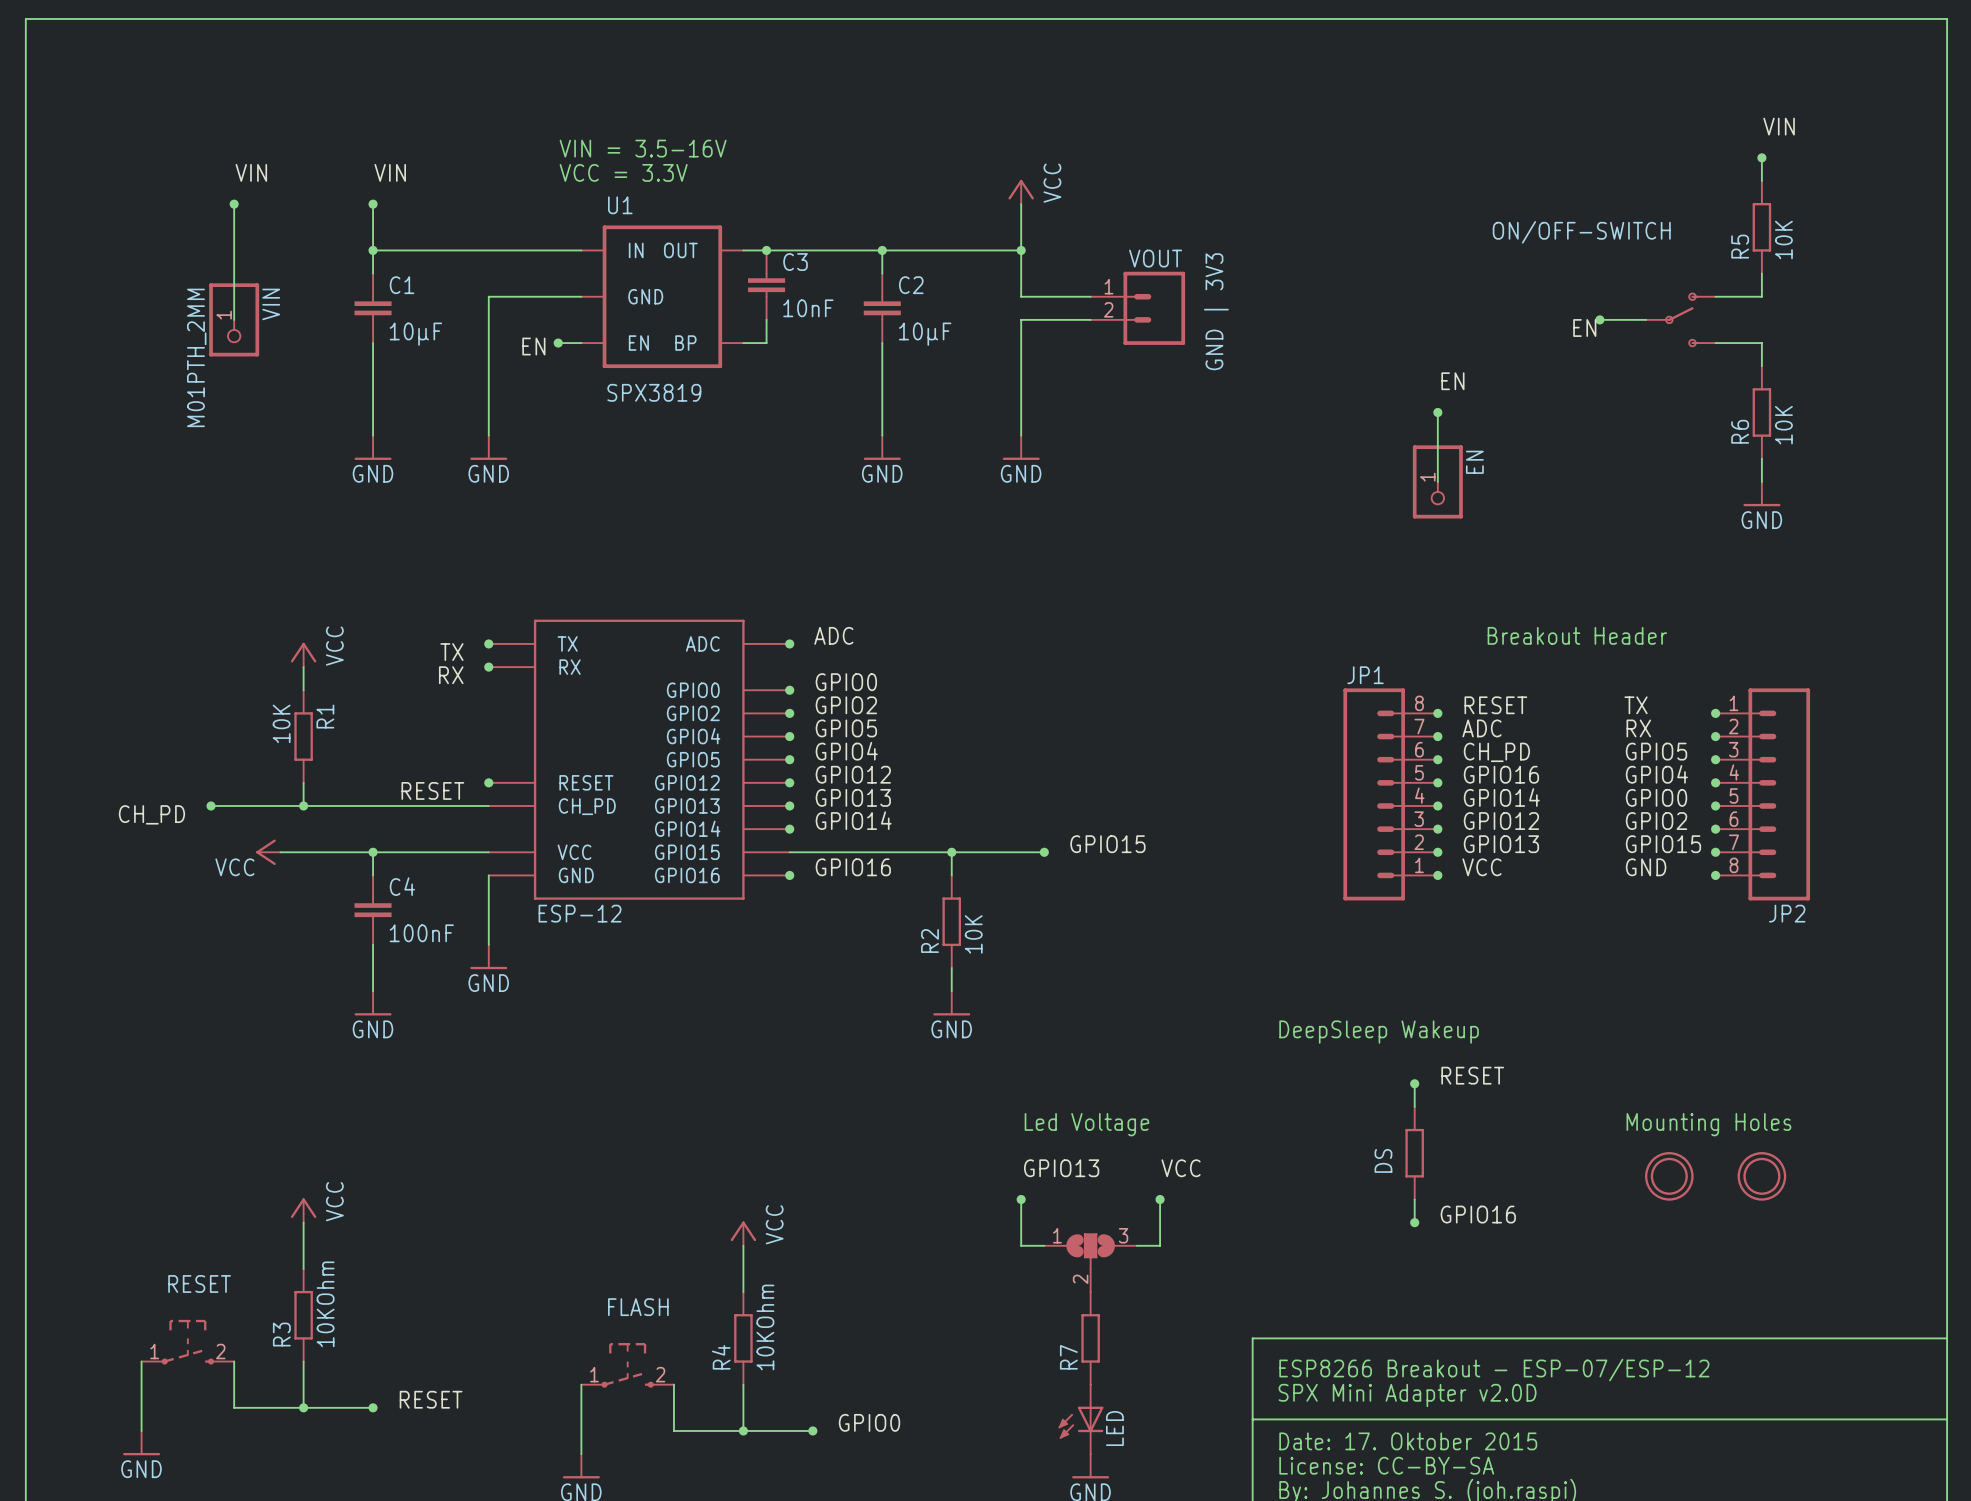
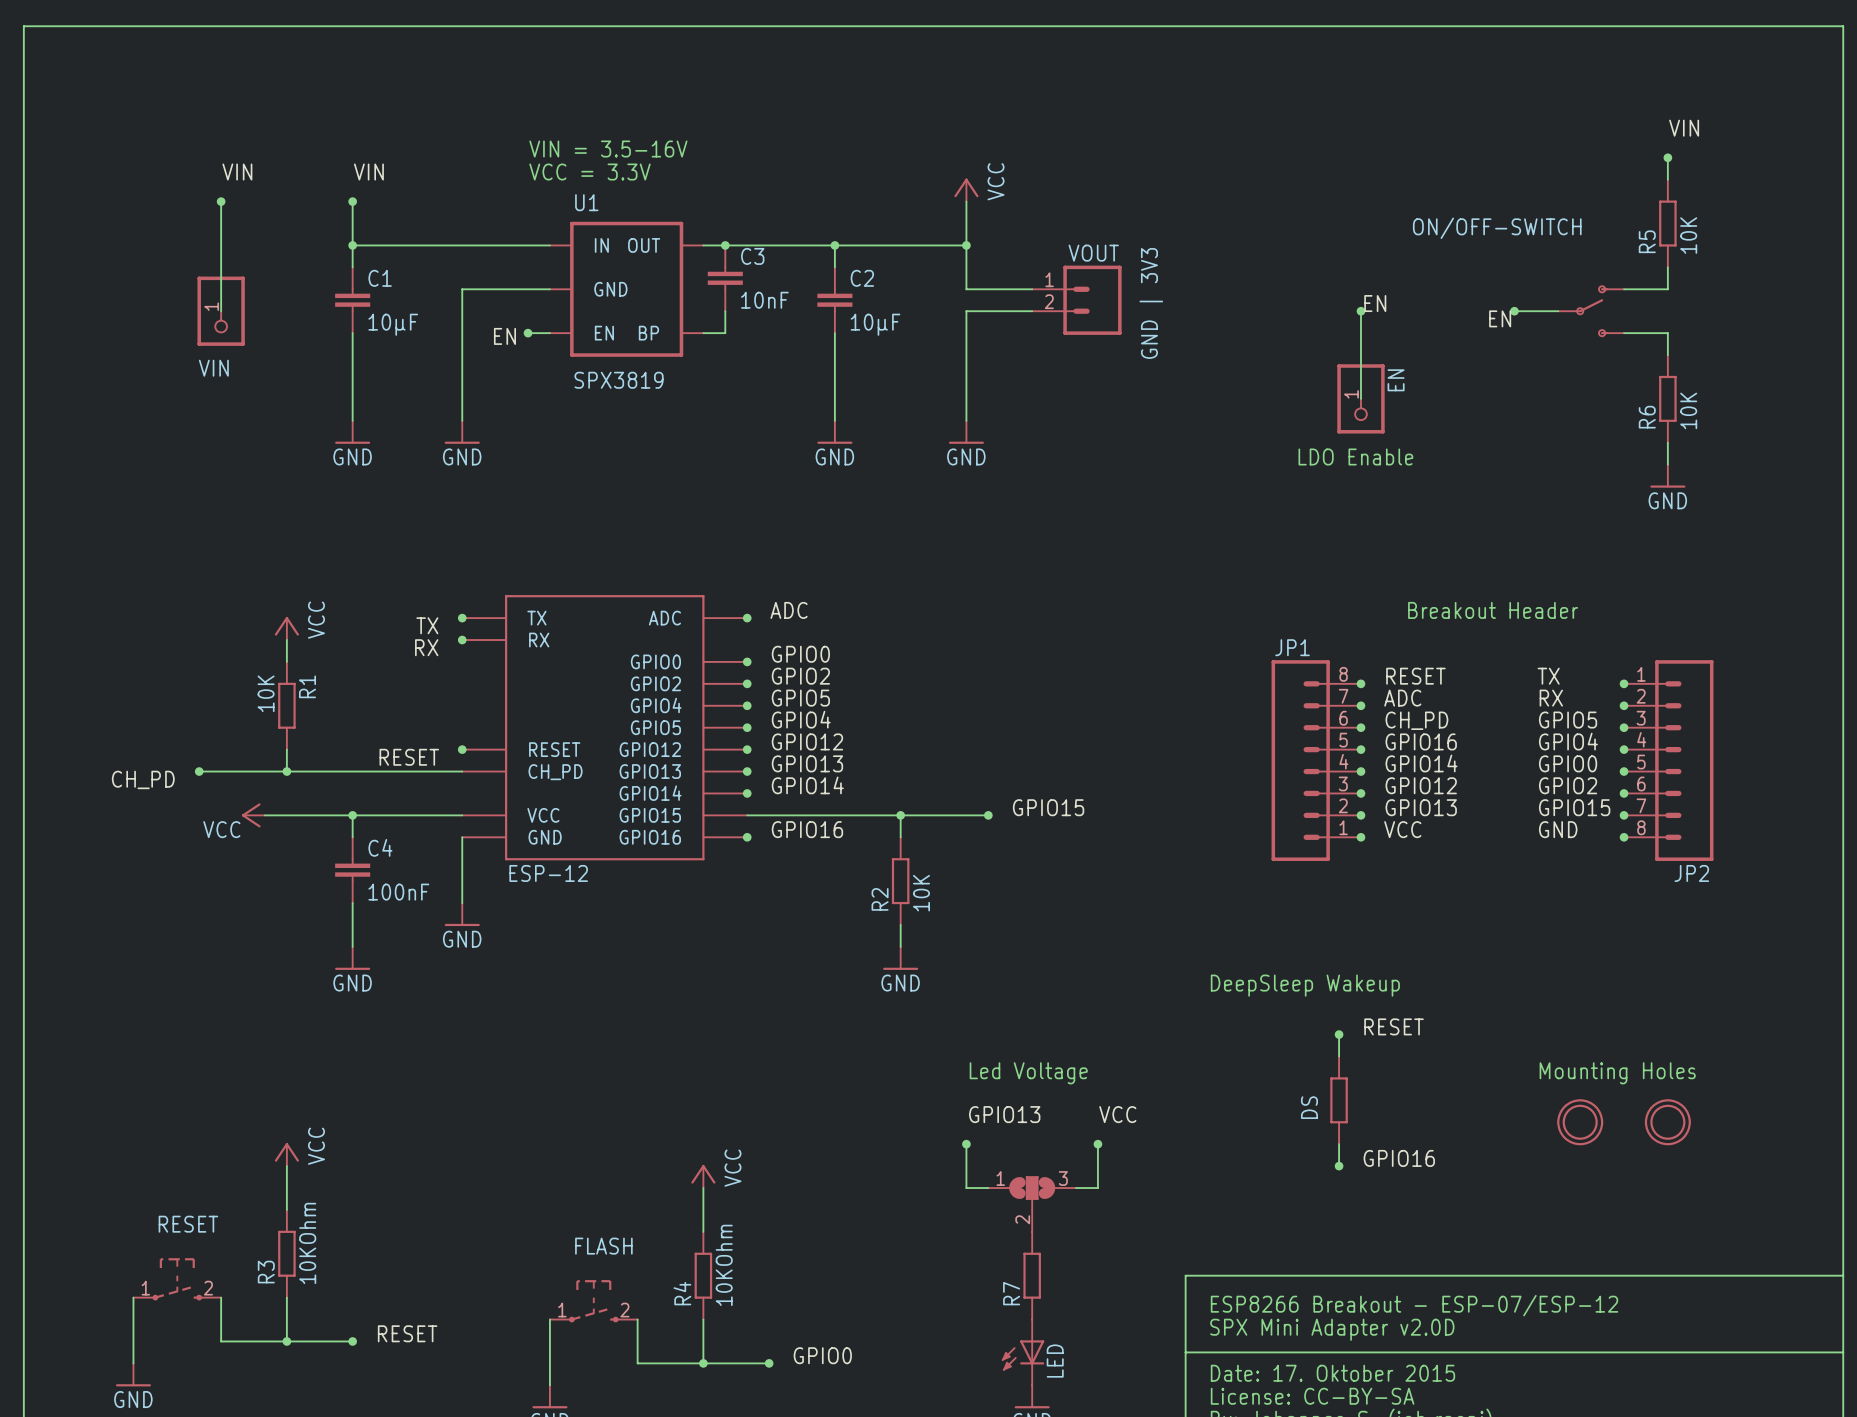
VIN name rotation: 0° (271, 304) -> 90° clockwise (213, 368)
VIN name position: VIN (271, 304) -> VIN (213, 368)
junction: none -> (1360, 311)
VIN value: M01PTH_2MM (196, 357) -> none
label position: EN (1452, 381) -> EN (1375, 303)
wire: (1437, 412) (1437, 481) -> (1360, 398) (1360, 311)
junction: (1437, 412) -> none
text: none -> LDO Enable (1355, 456)
EN position: (1437, 481) -> (1360, 398)

